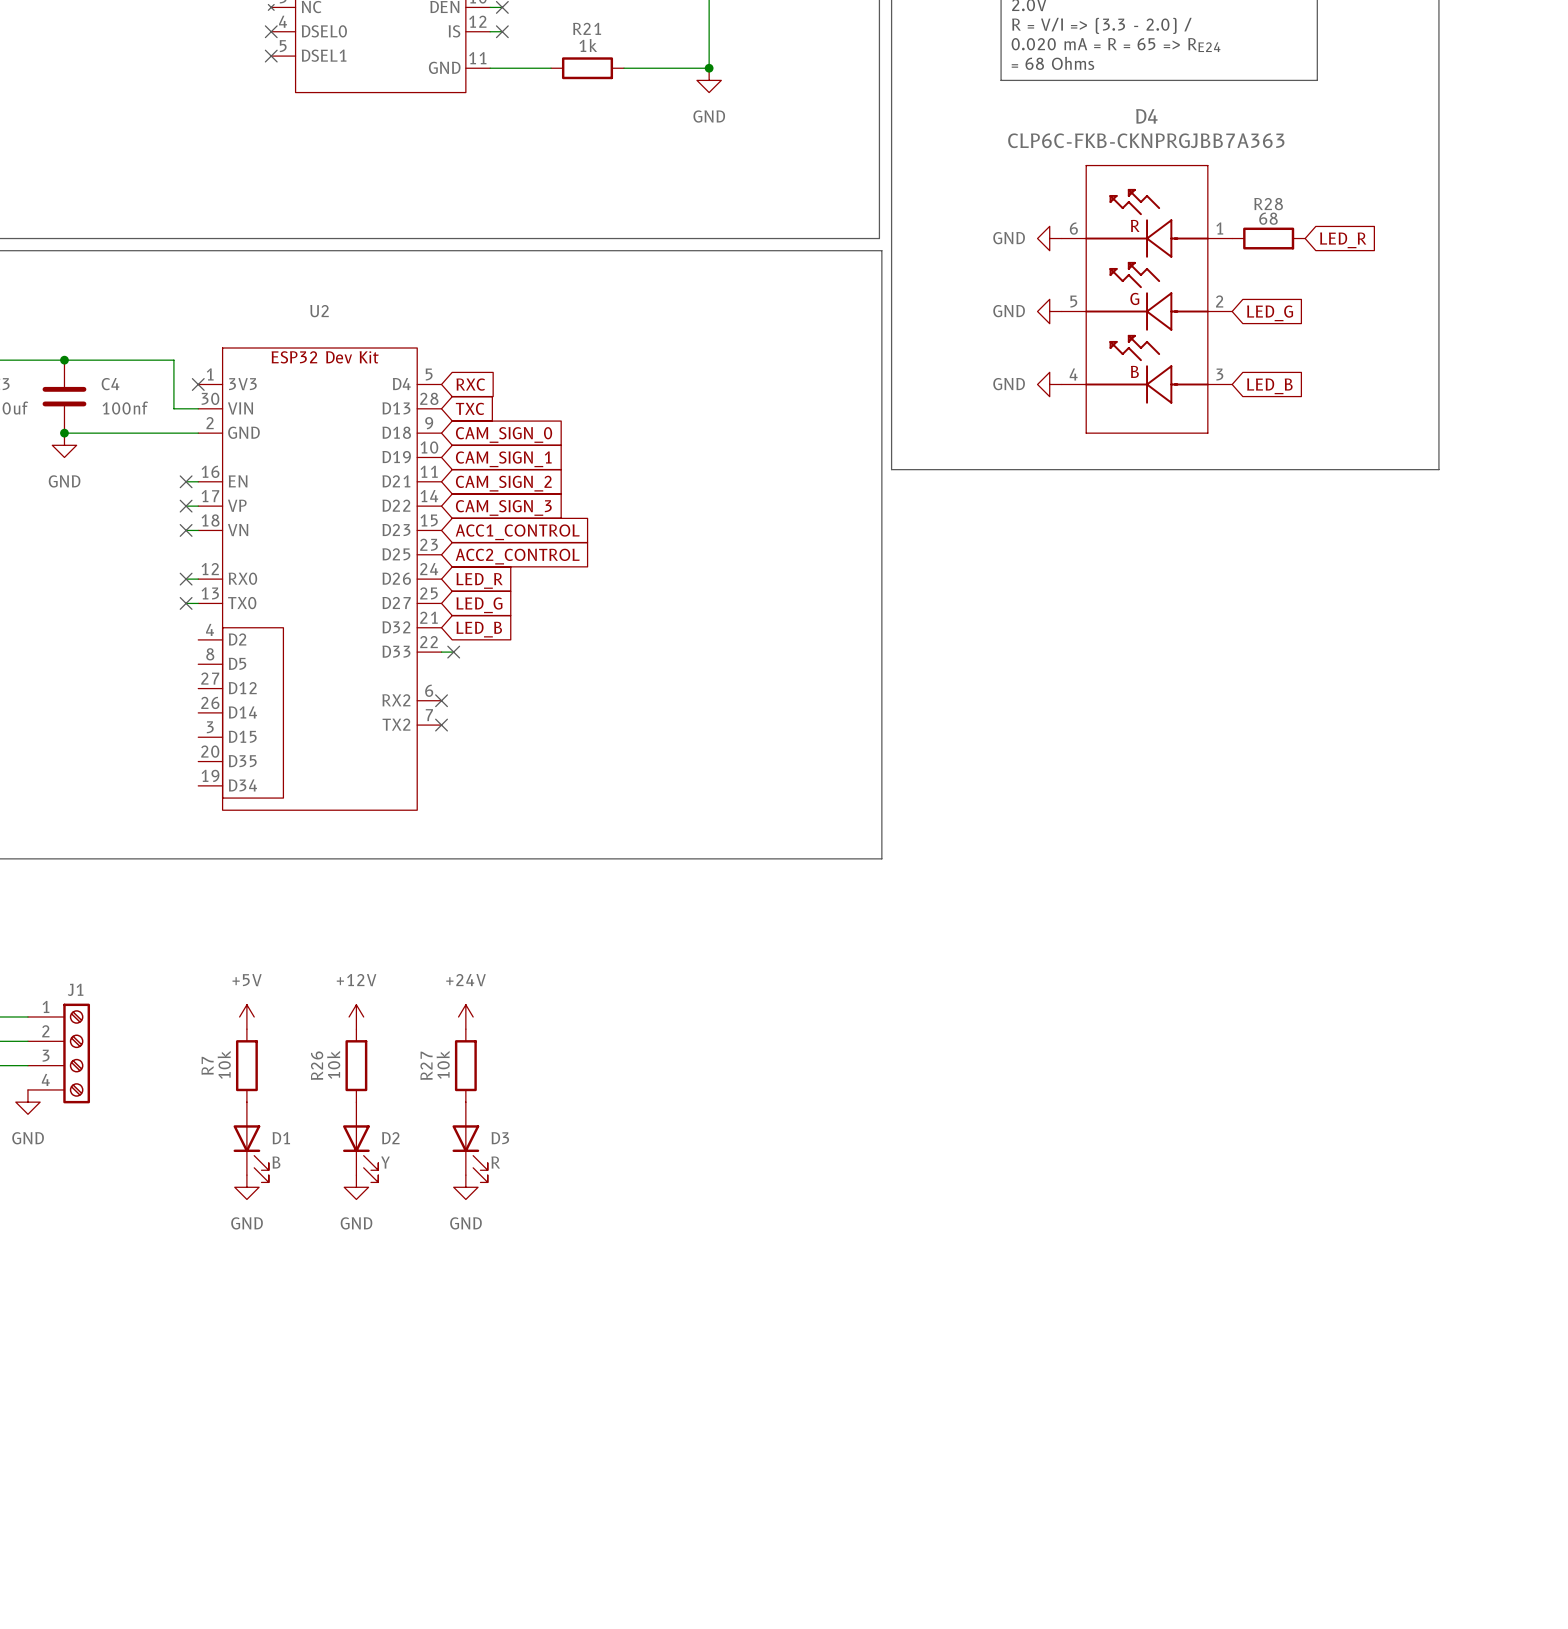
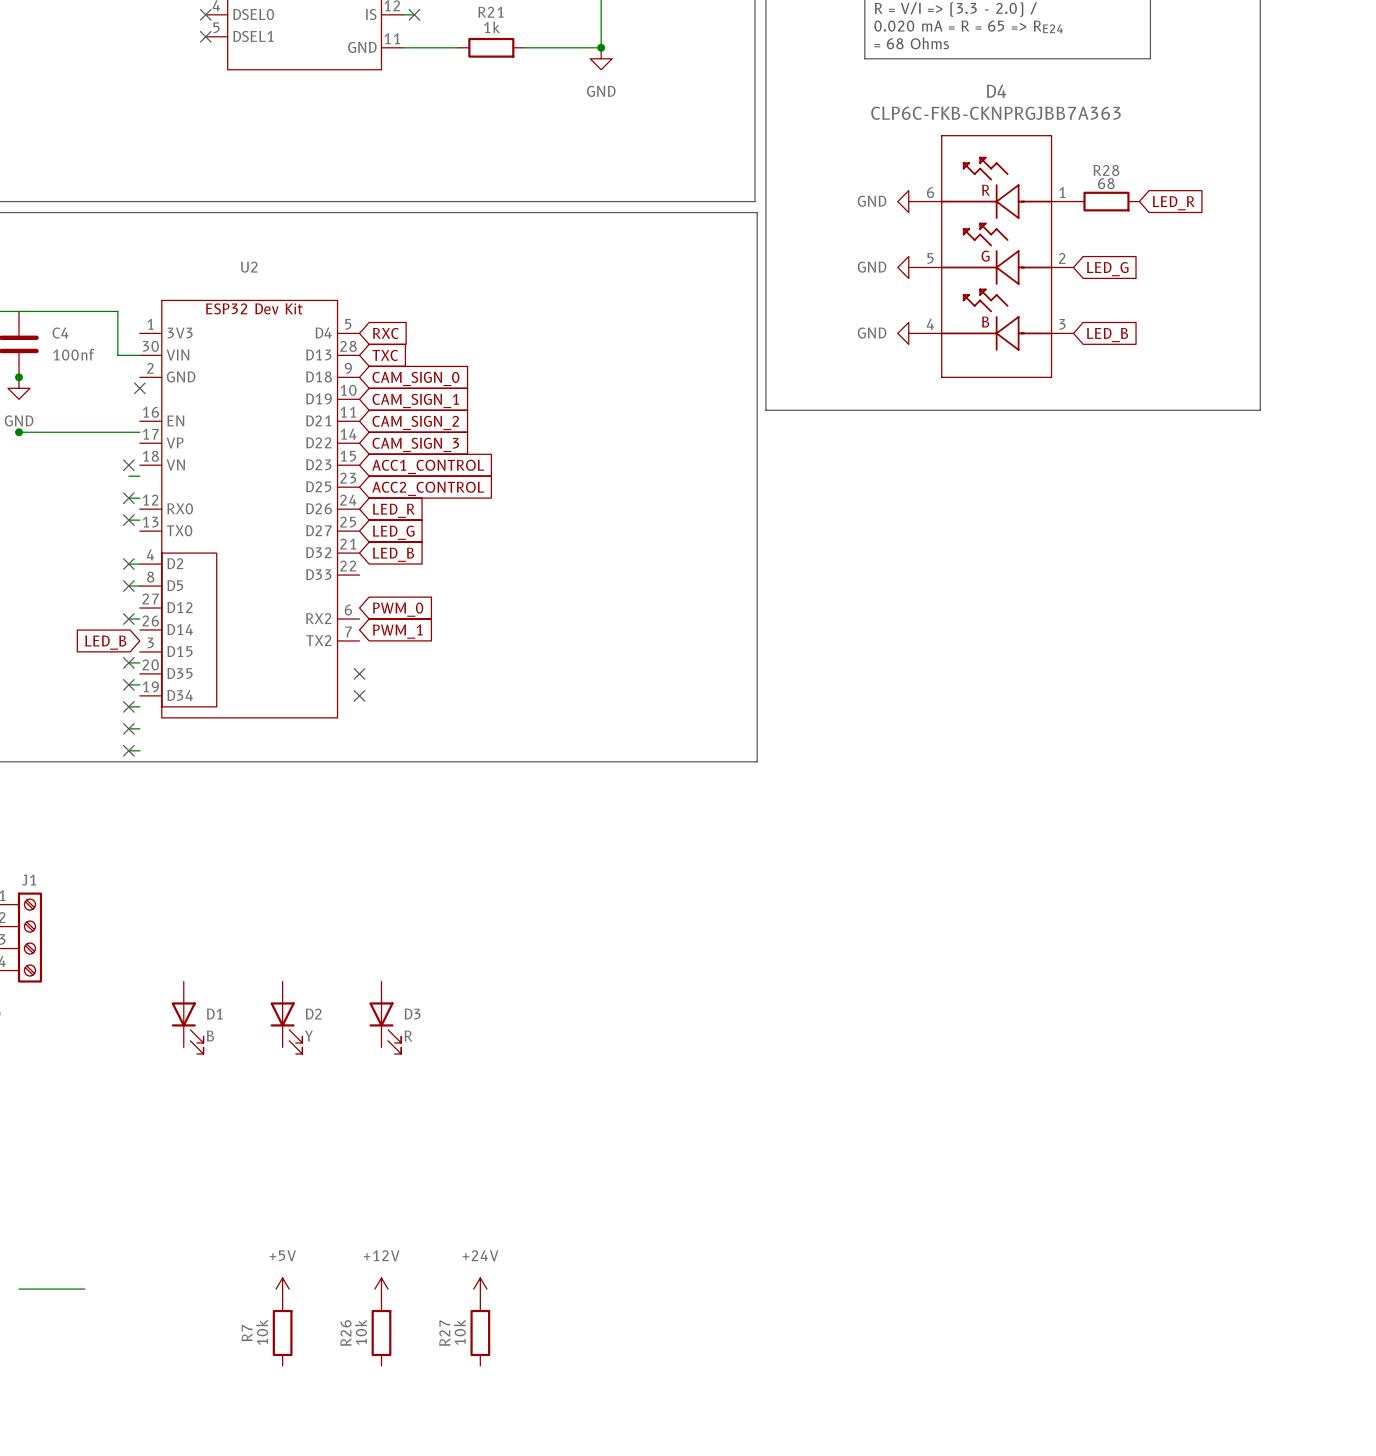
junction: (64, 360) -> none
no-connect mark: (198, 384) -> none
wire: (64, 433) (198, 433) -> (18, 432) (139, 432)
no-connect mark: none -> (139, 388)
wire: (186, 481) (198, 481) -> (128, 476) (139, 476)
no-connect mark: (186, 481) -> none
junction: none -> (18, 432)
wire: (186, 506) (198, 506) -> (128, 498) (139, 498)
no-connect mark: (186, 506) -> none
wire: (186, 530) (198, 530) -> (128, 520) (139, 520)
no-connect mark: none -> (128, 498)
wire: (186, 579) (198, 579) -> (128, 564) (139, 564)
no-connect mark: (186, 579) -> none
no-connect mark: none -> (128, 520)
wire: (186, 603) (198, 603) -> (128, 586) (139, 586)
no-connect mark: (186, 603) -> none
no-connect mark: none -> (128, 564)
wire: (441, 652) (453, 652) -> none
no-connect mark: (453, 652) -> none
no-connect mark: none -> (128, 586)
global label: none -> PWM_0 (398, 609)
wire: none -> (128, 618) (139, 618)
no-connect mark: none -> (128, 618)
no-connect mark: (441, 700) -> none
global label: none -> PWM_1 (397, 631)
no-connect mark: (441, 725) -> none
global label: none -> LED_B (105, 642)
wire: none -> (128, 662) (139, 662)
no-connect mark: none -> (128, 662)
no-connect mark: none -> (359, 673)
wire: none -> (128, 684) (139, 684)
no-connect mark: none -> (128, 684)
no-connect mark: none -> (359, 695)
wire: none -> (128, 706) (139, 706)
no-connect mark: none -> (128, 706)
wire: none -> (128, 728) (139, 728)
no-connect mark: none -> (128, 728)
wire: none -> (128, 750) (139, 750)
no-connect mark: none -> (128, 750)
power symbol: +5V (246, 1016) -> none
power symbol: +12V (356, 1016) -> none
power symbol: +24V (465, 1016) -> none
R7 position: (246, 1065) -> (282, 1333)
R26 position: (356, 1065) -> (381, 1333)
R27 position: (465, 1065) -> (480, 1333)
power symbol: GND (246, 1187) -> none
power symbol: GND (356, 1187) -> none
power symbol: GND (465, 1187) -> none
wire: none -> (18, 1289) (84, 1289)
power symbol: none -> +5V (282, 1289)
power symbol: none -> +12V (381, 1289)
power symbol: none -> +24V (480, 1289)

